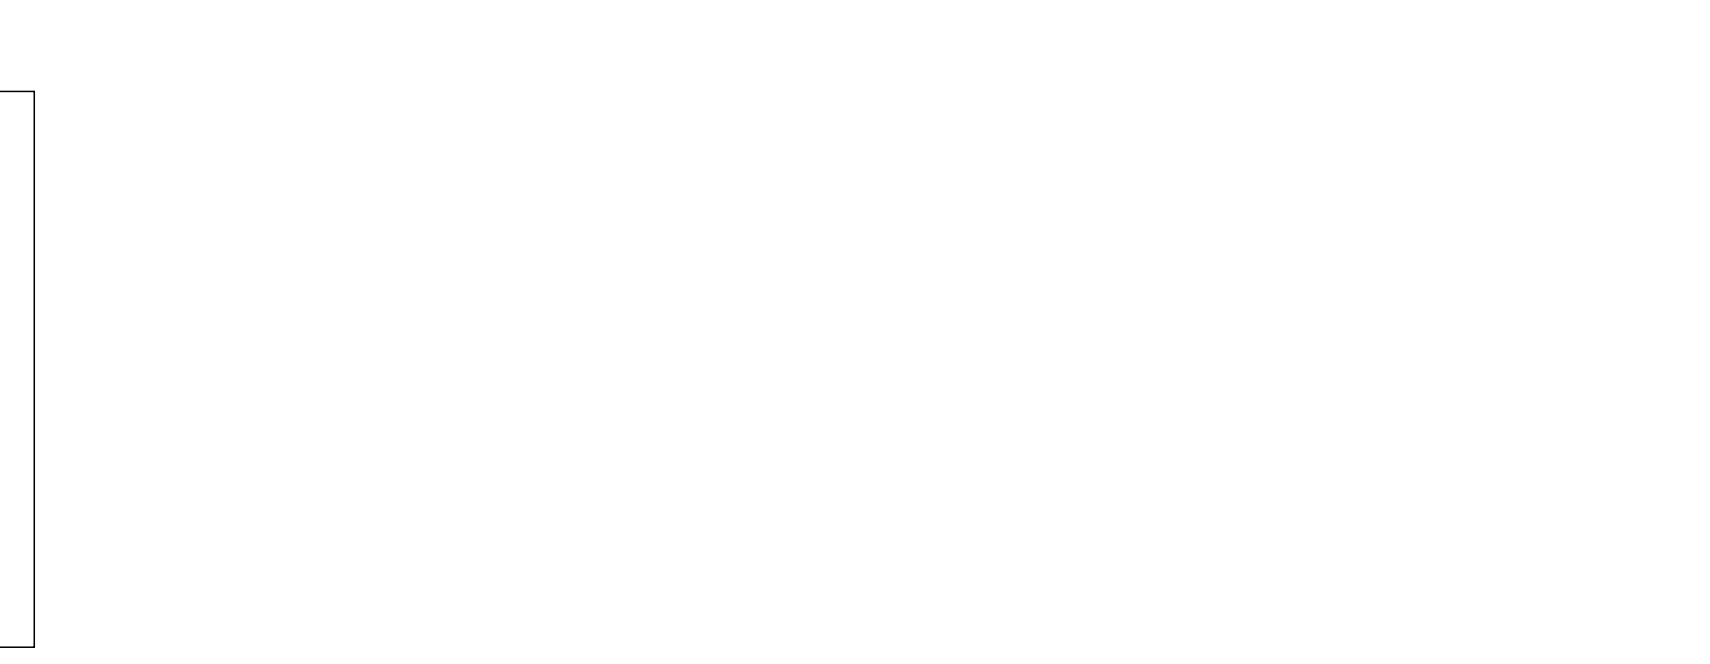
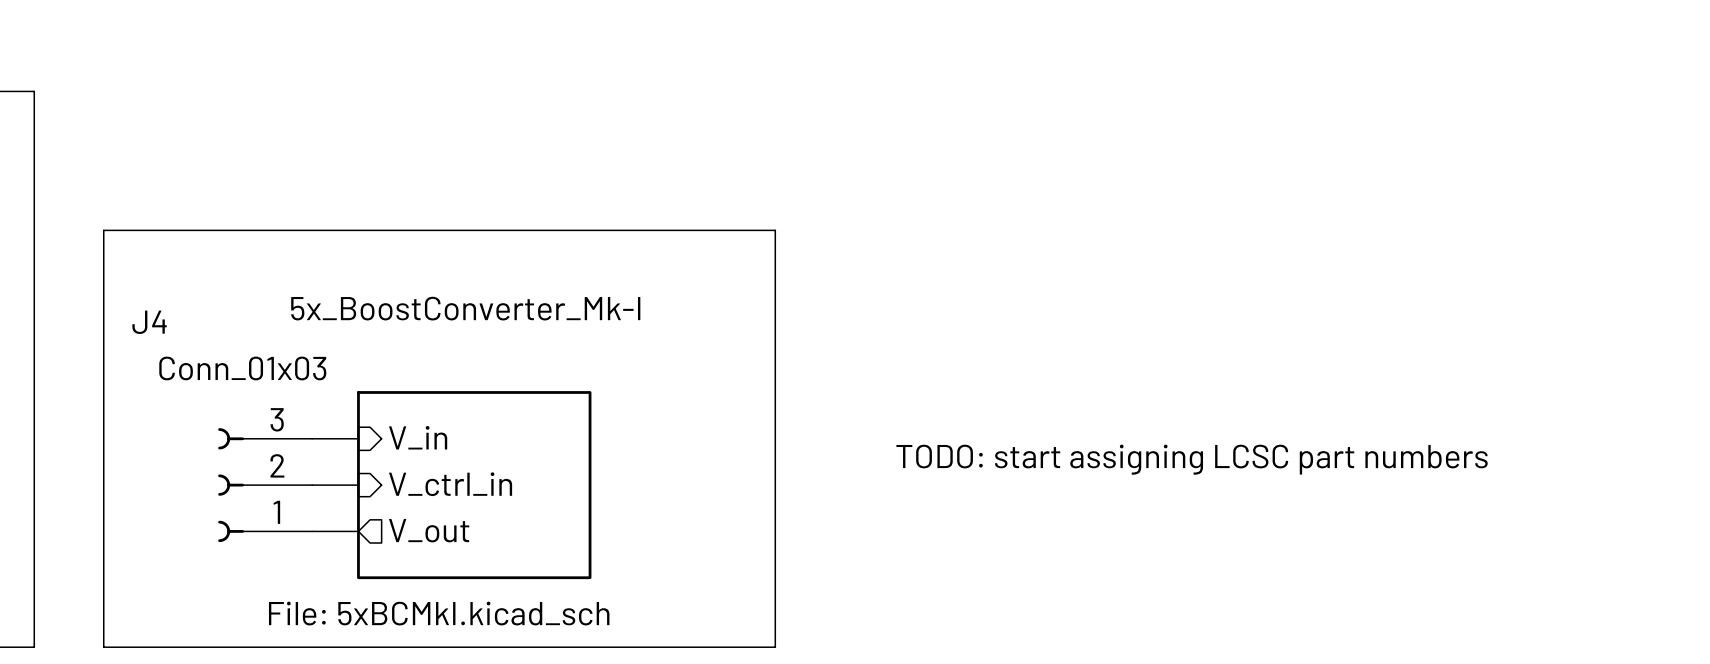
line: none -> (103, 230) (775, 230) (775, 647) (103, 647) (103, 230)
sheet pin: none -> V_in (418, 437)
wire: none -> (312, 438) (358, 438)
text: none -> TODO: start assigning LCSC part numbers (1192, 459)
sheet pin: none -> V_ctrl_in (450, 484)
J4: none -> Conn_01x03 (265, 485)
wire: none -> (312, 485) (358, 485)
sheet 5x_BoostConverter_Mk-I: none -> File: 5xBCMkI.kicad_sch (474, 485)
sheet pin: none -> V_out (429, 530)
wire: none -> (312, 531) (358, 531)

